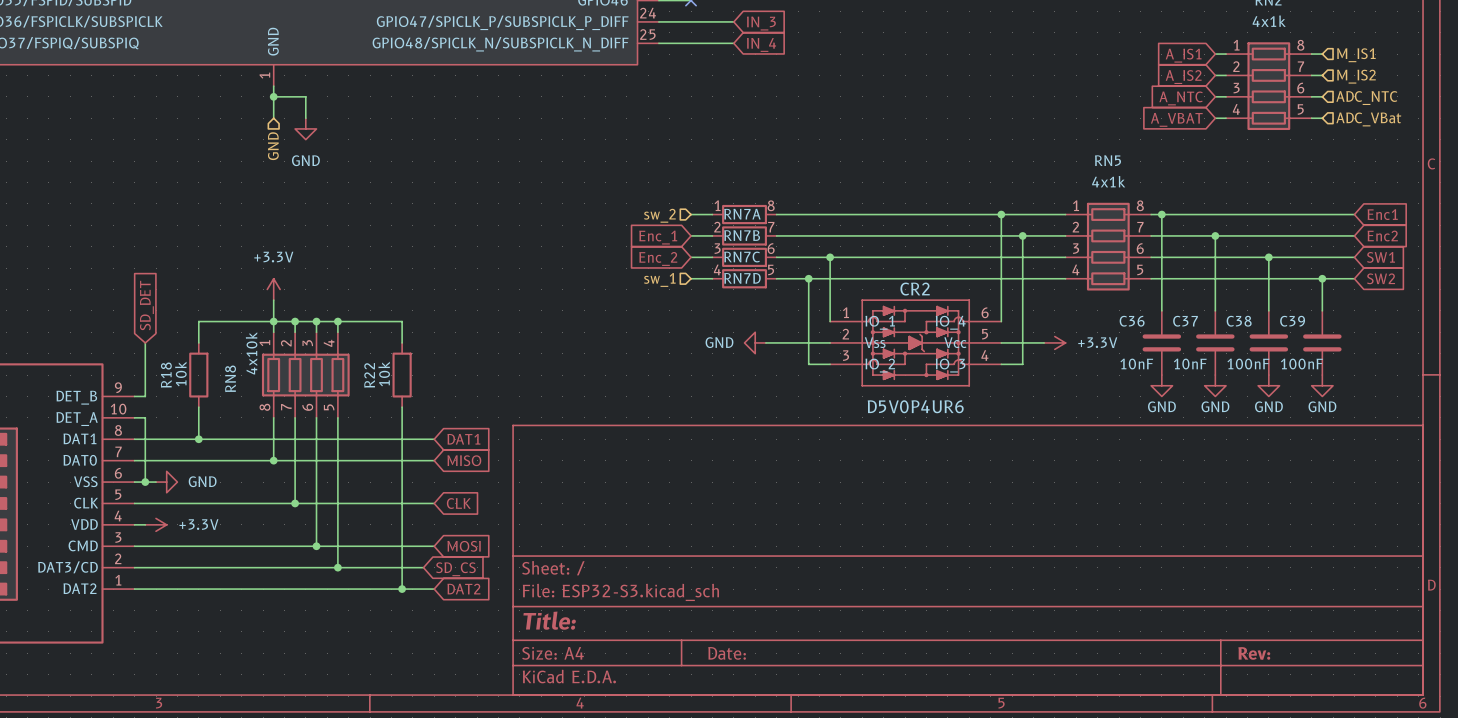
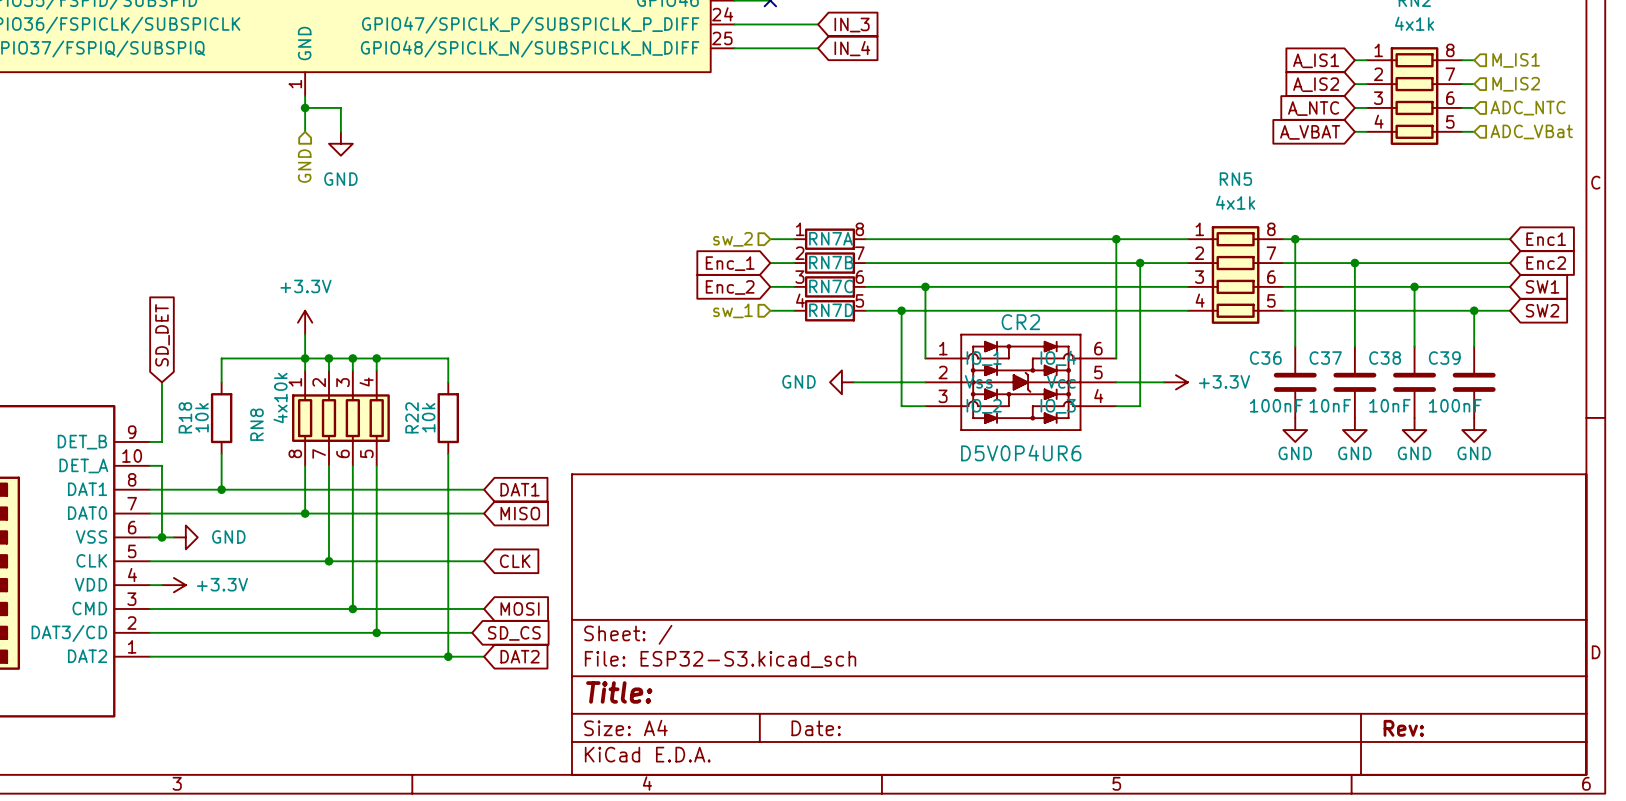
C36 value: 10nF (1136, 364) -> 100nF (1276, 405)
C38 value: 100nF (1248, 364) -> 10nF (1389, 405)

